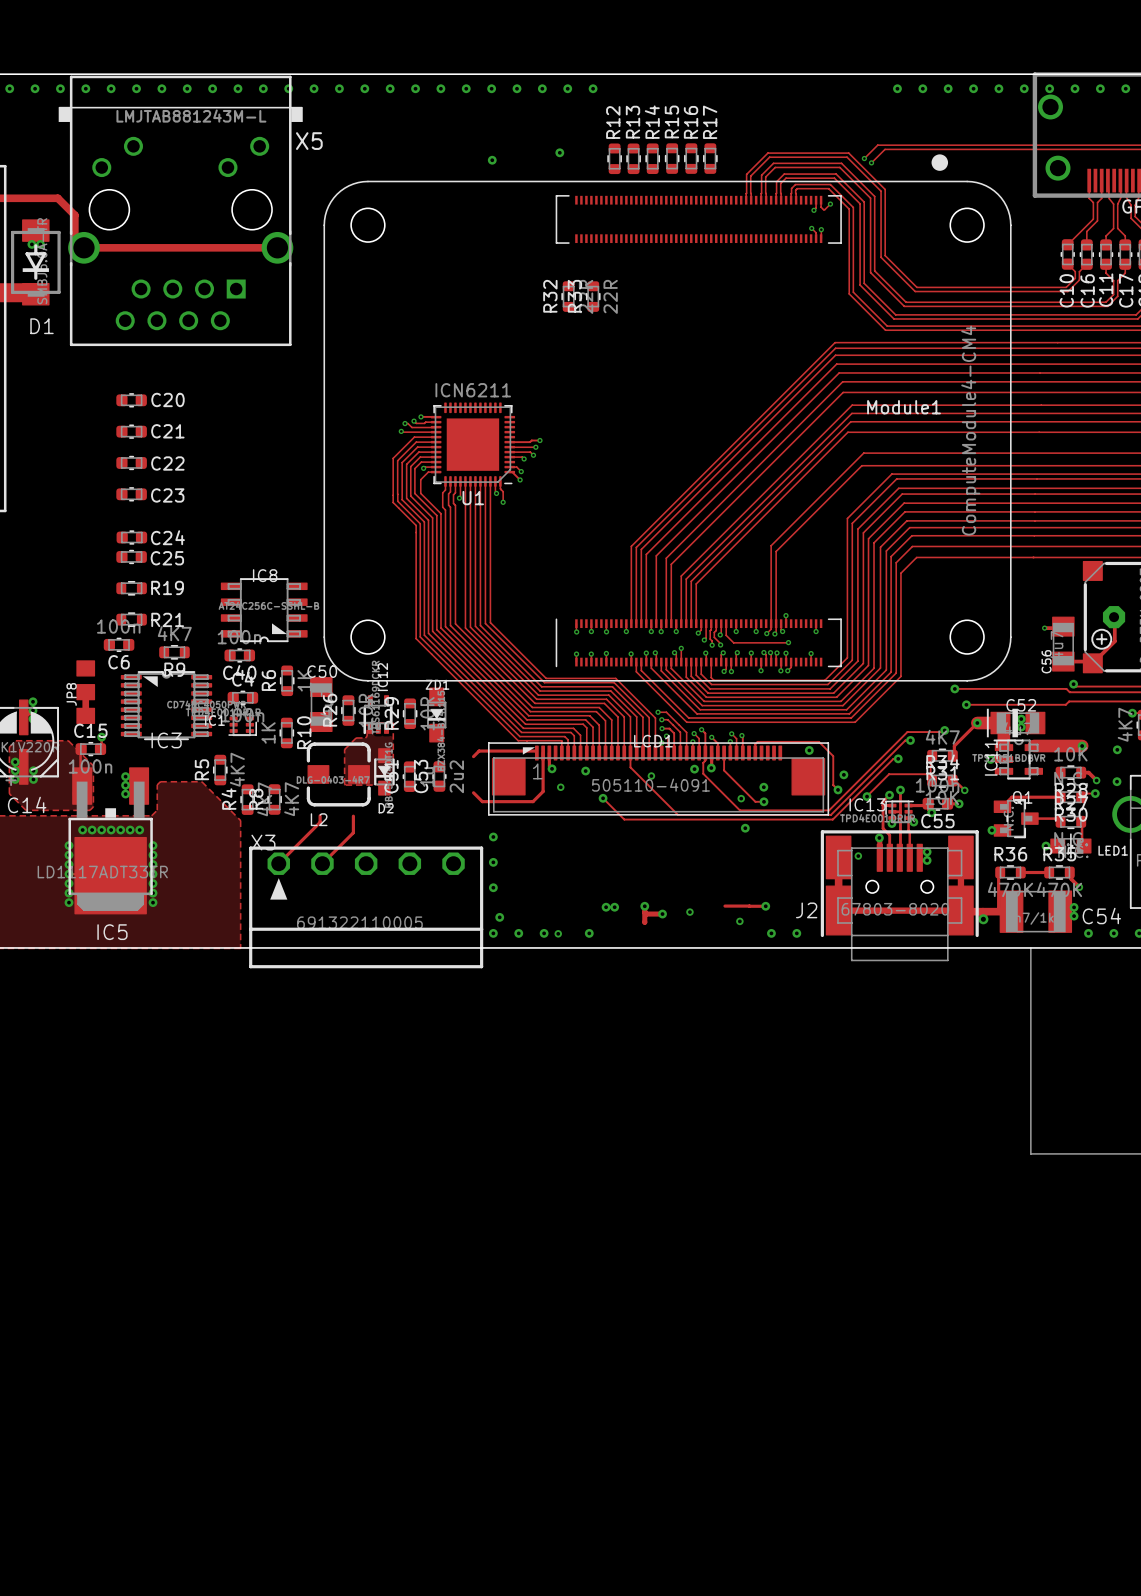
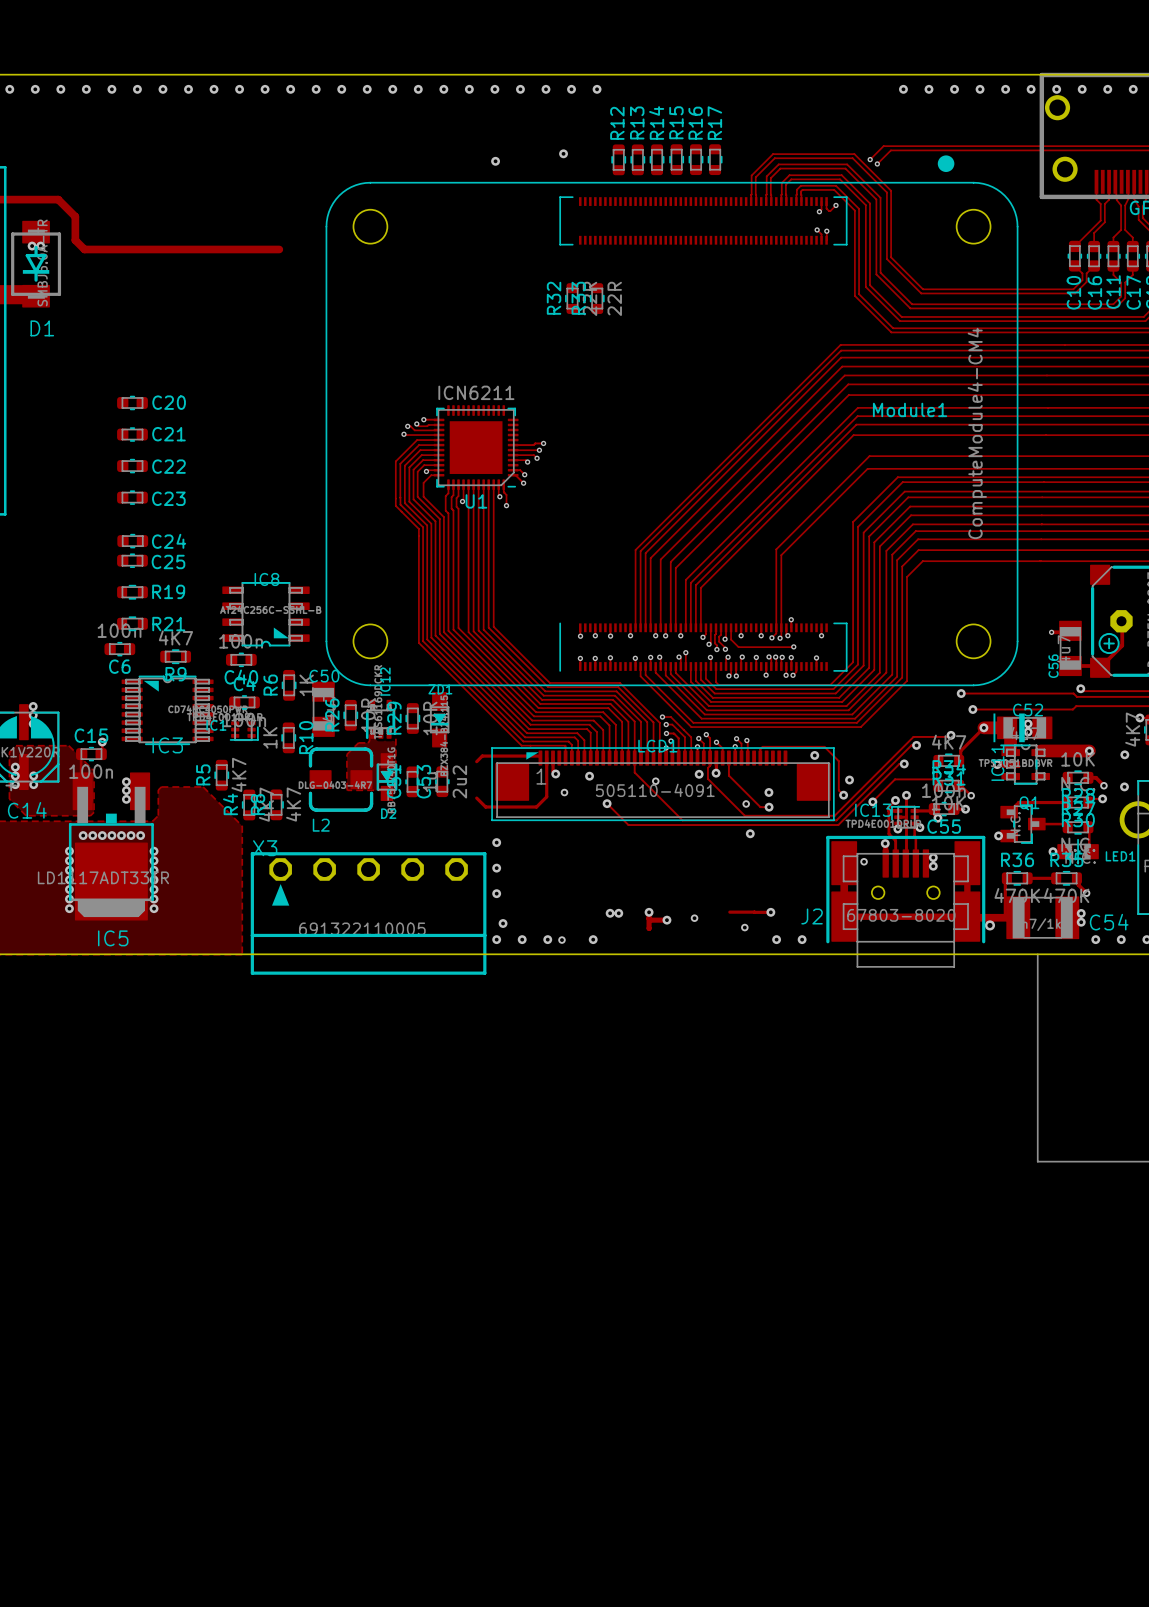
X5: LMJTAB881243M-L (180, 210) -> none
JP8: (85, 692) -> none
track: (320, 815) (320, 822) (278, 863) -> none
track: (353, 816) (353, 832) (322, 863) -> none

